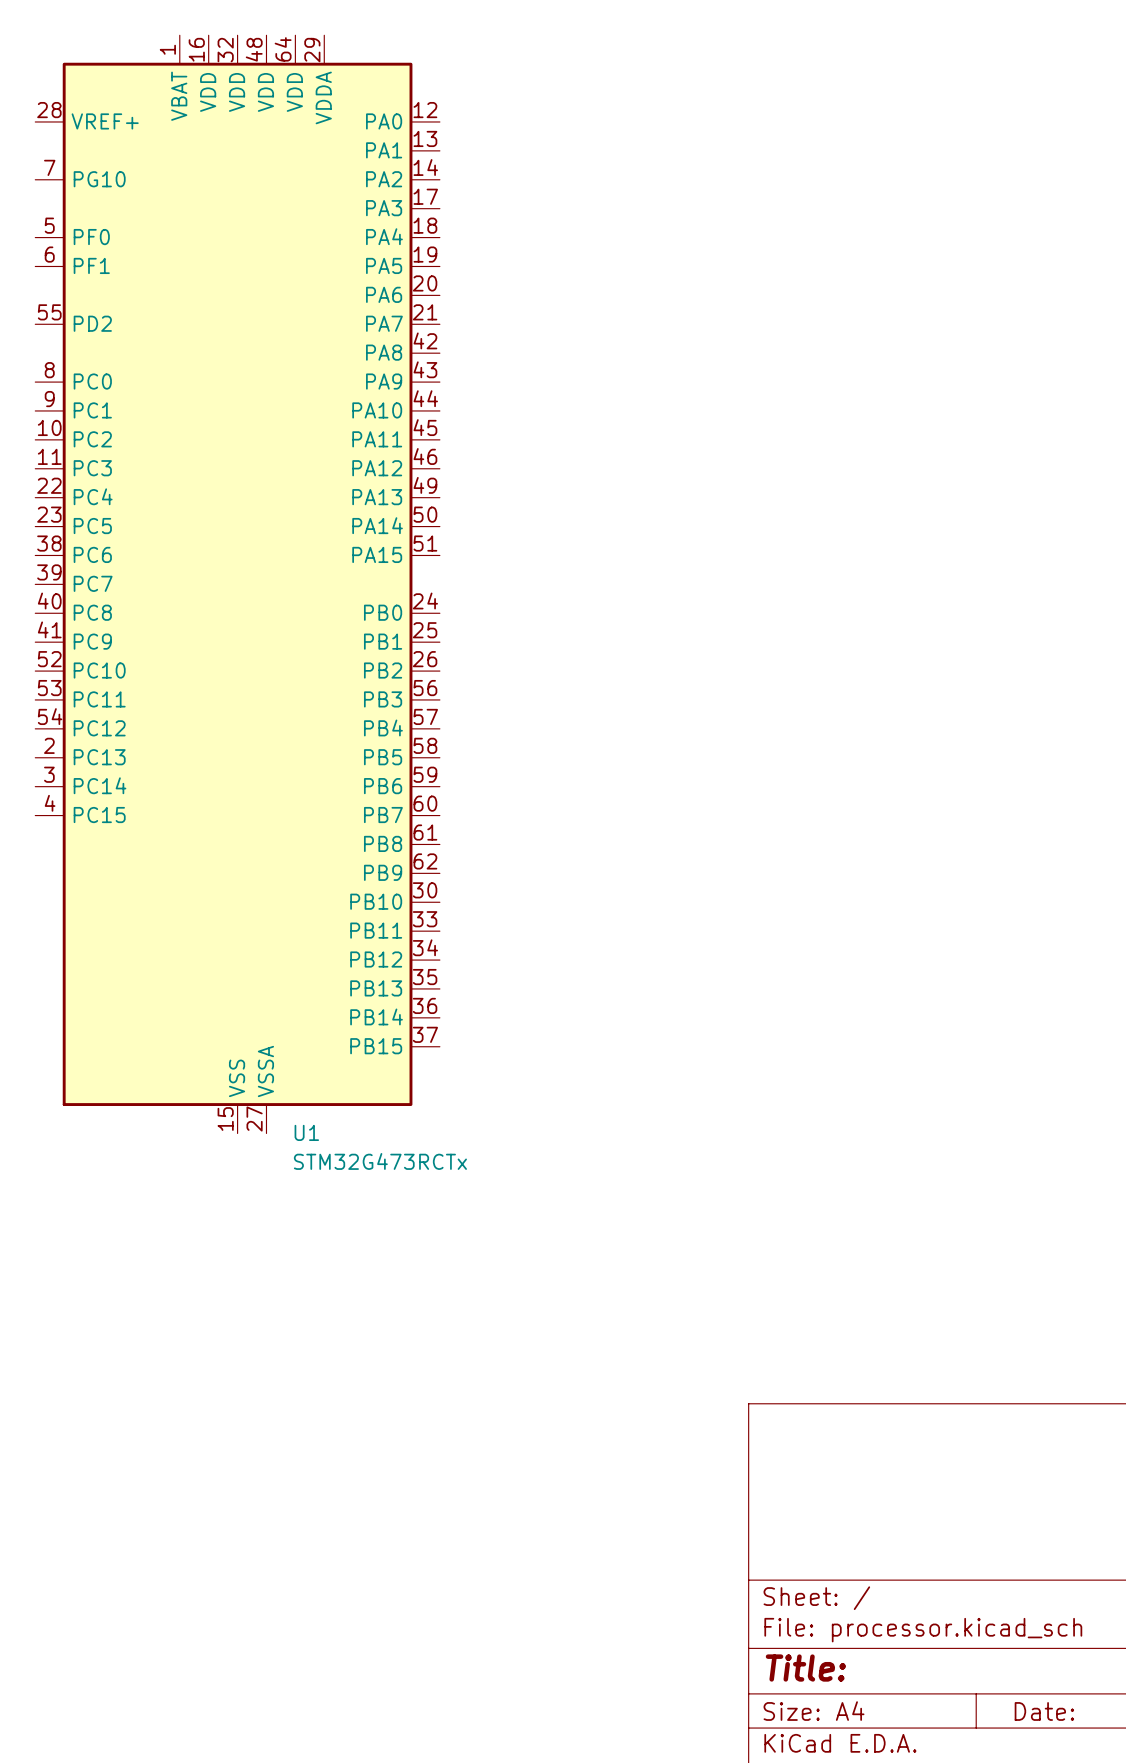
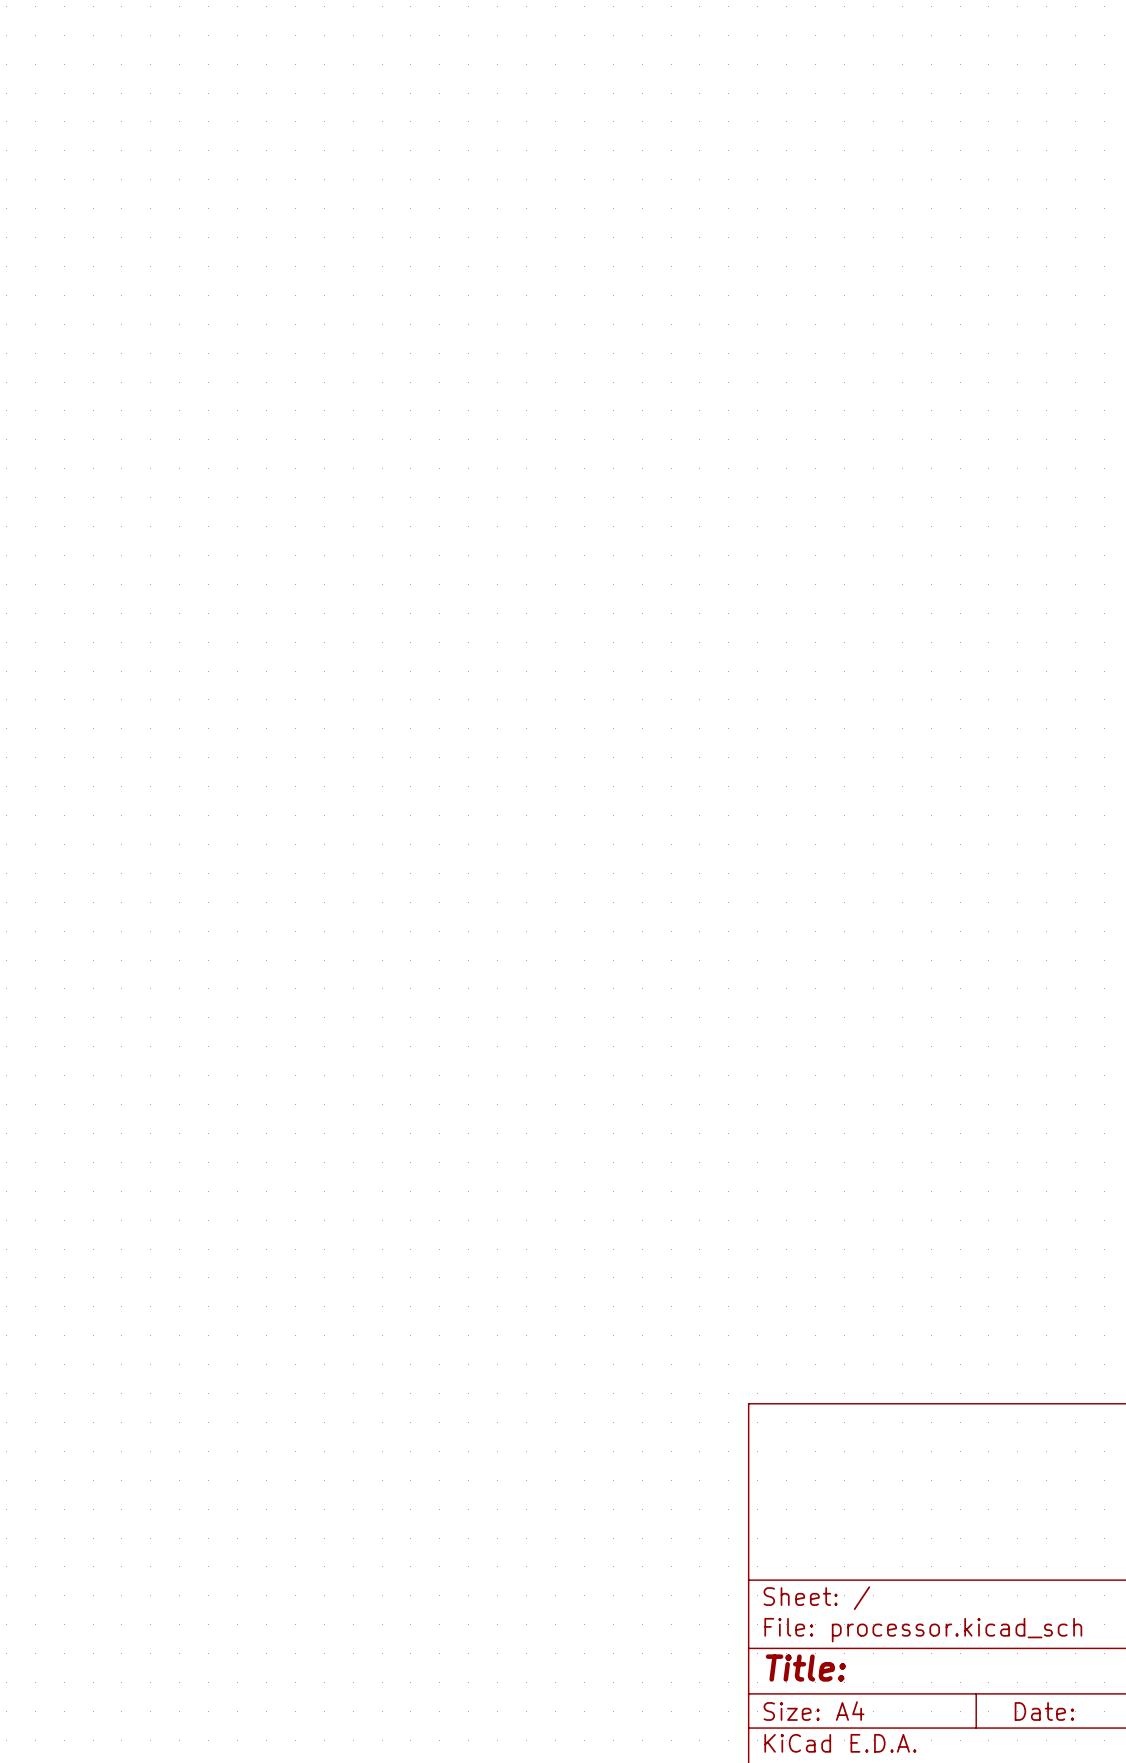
U1: STM32G473RCTx (237, 584) -> none

